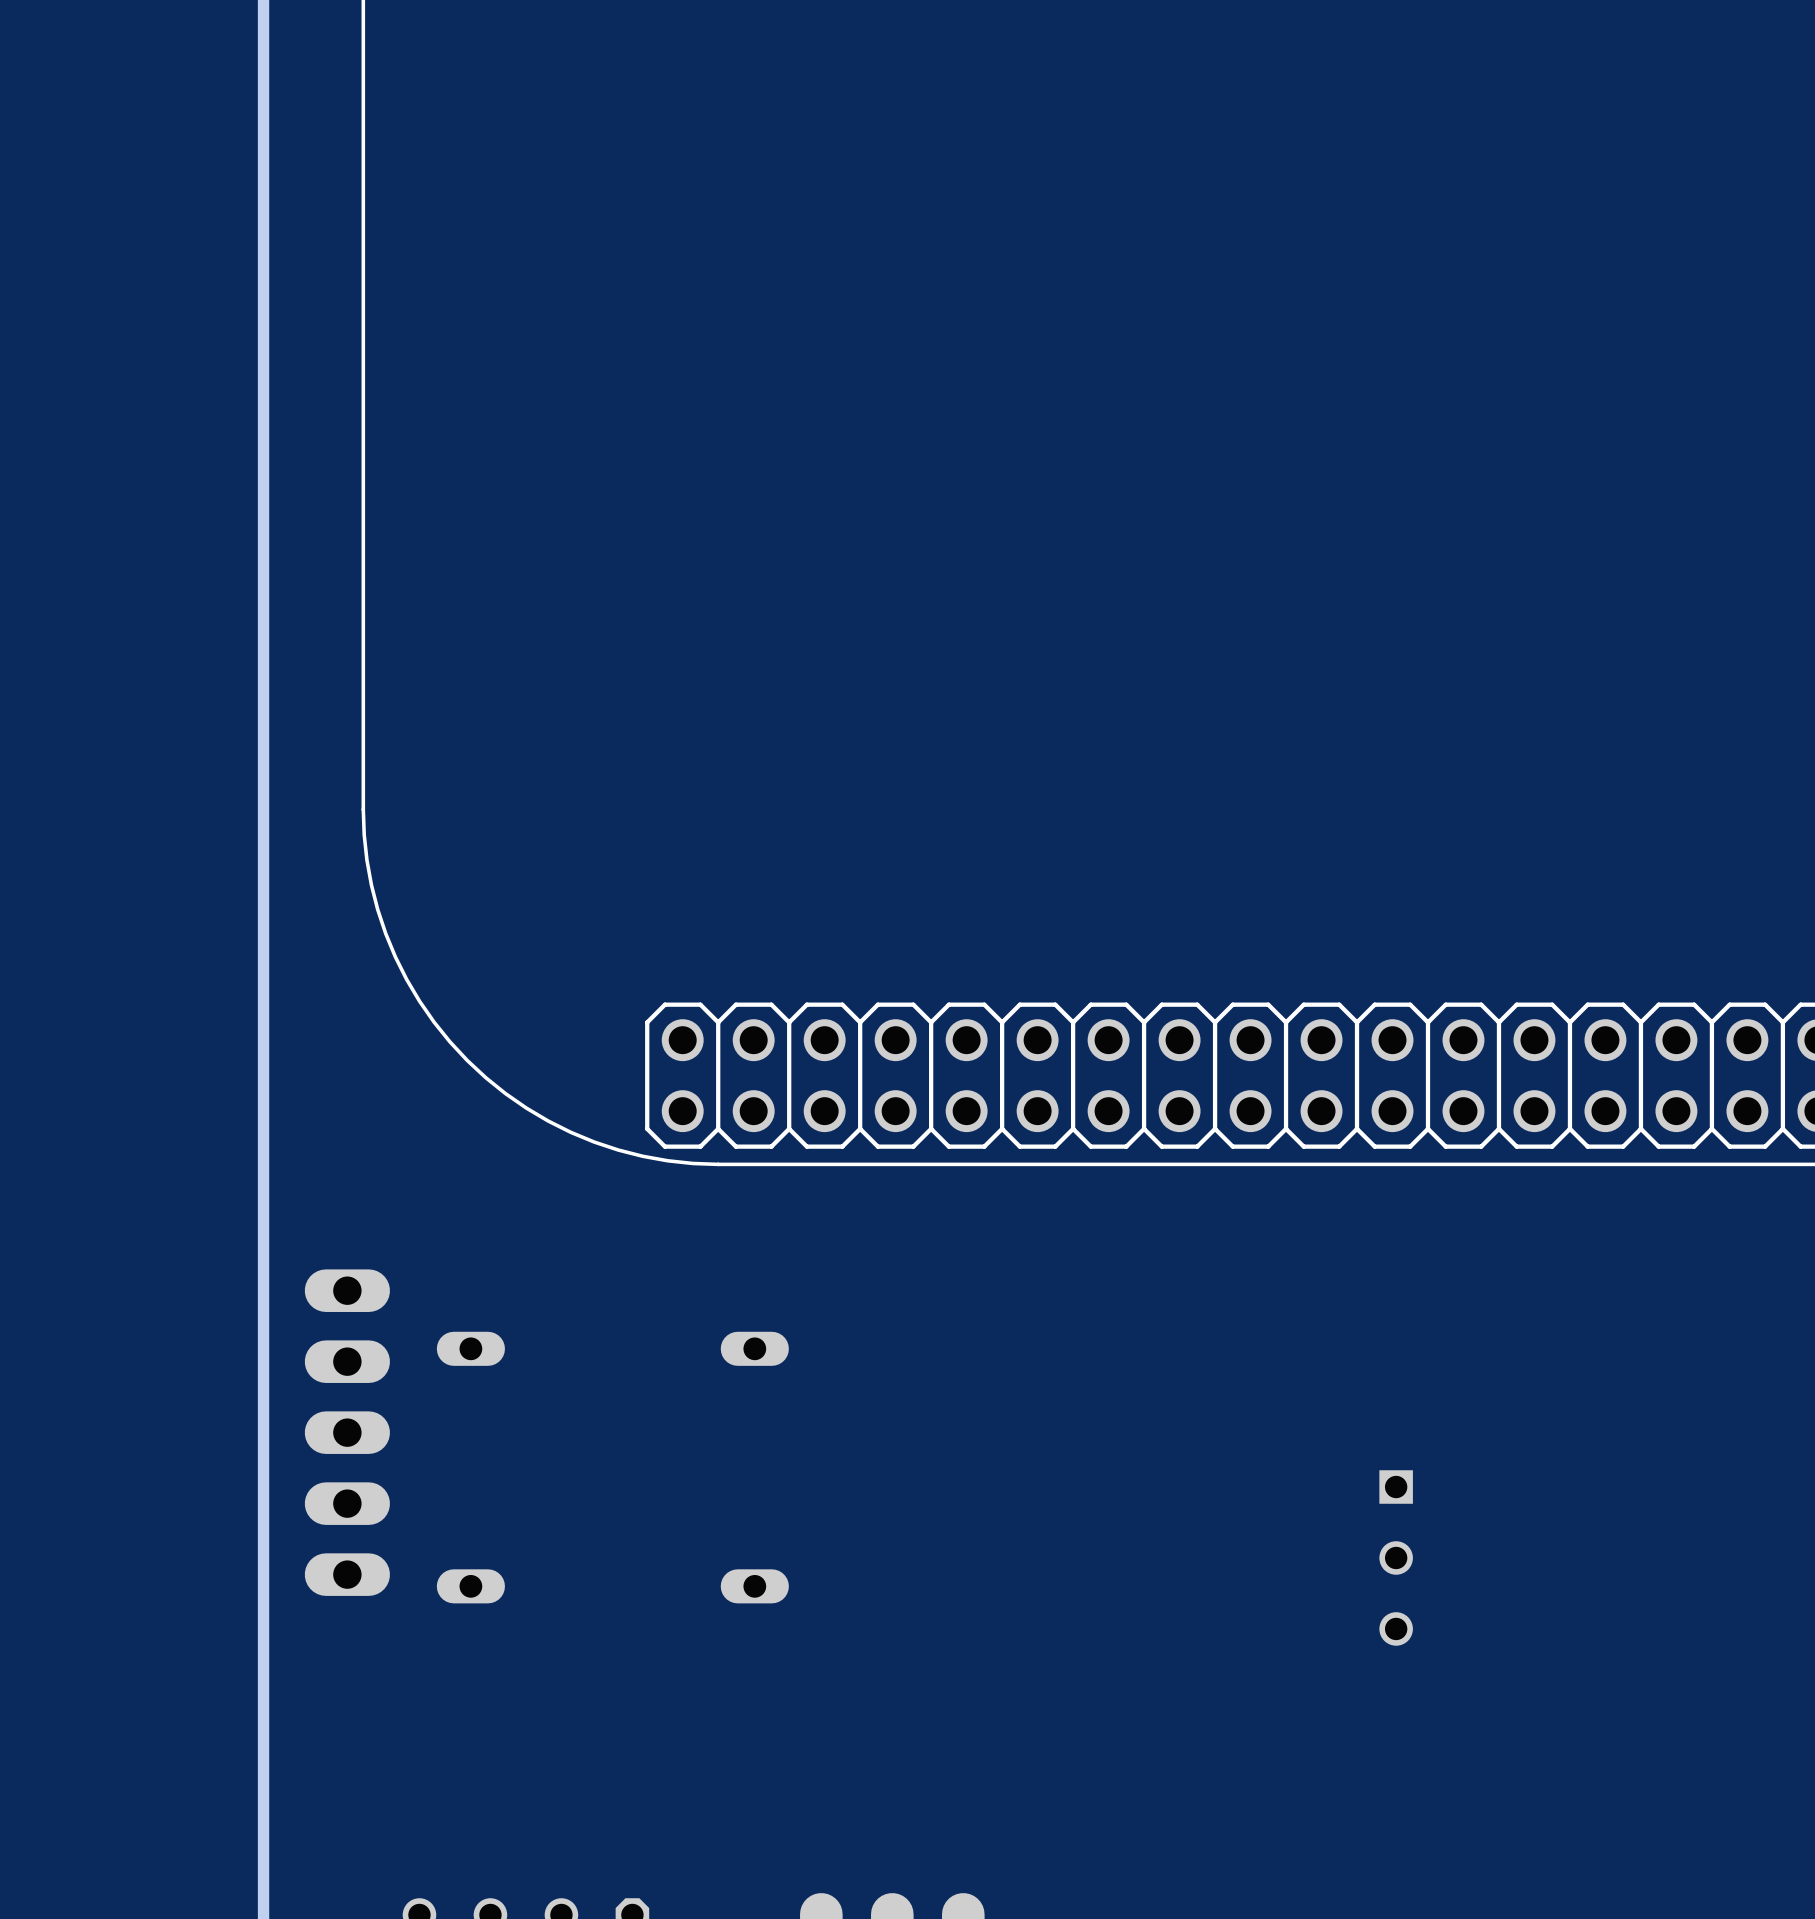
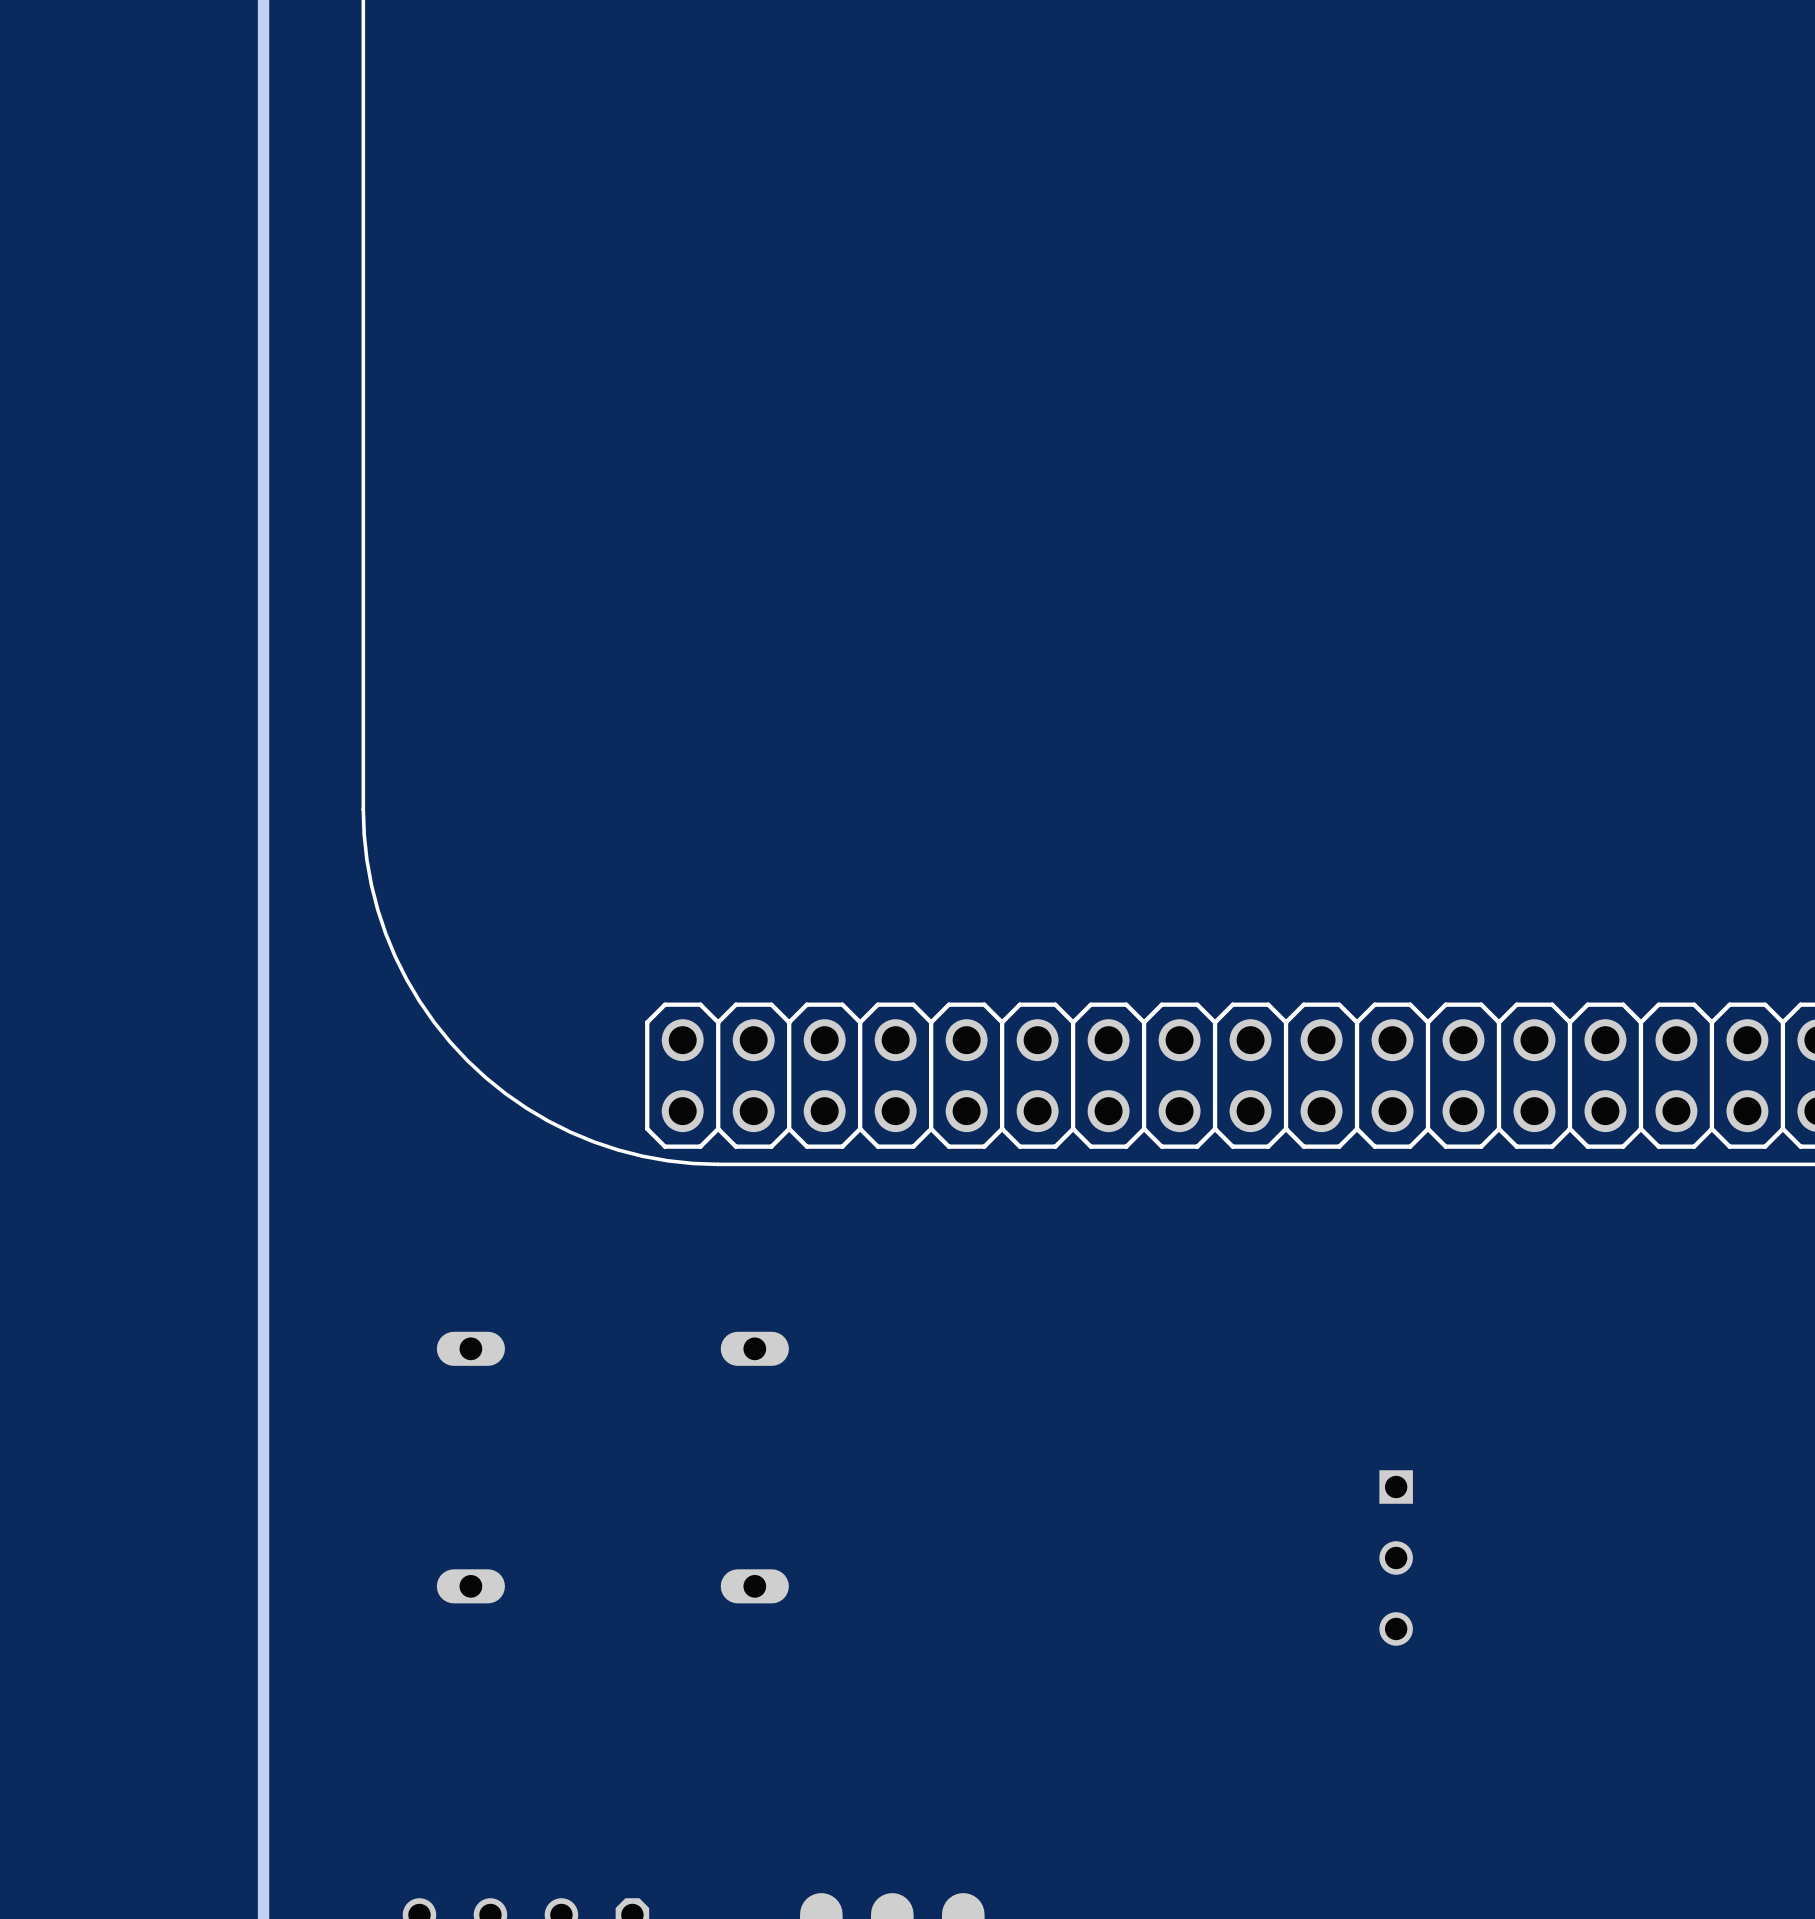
part: (347, 1432) -> none

